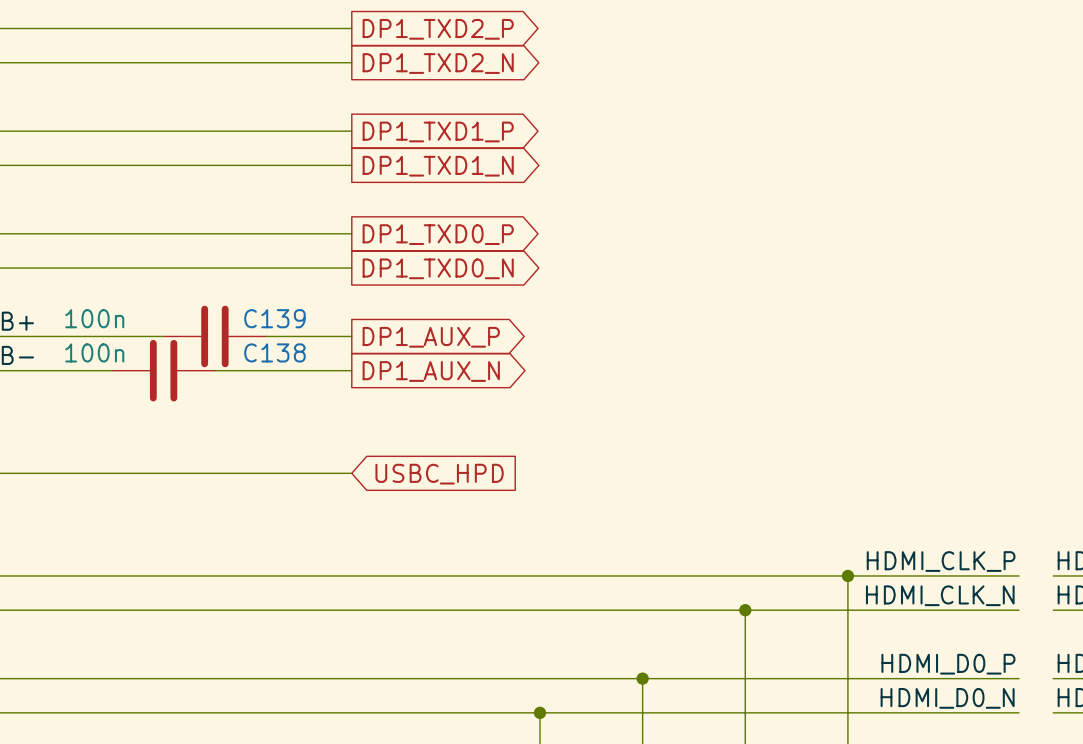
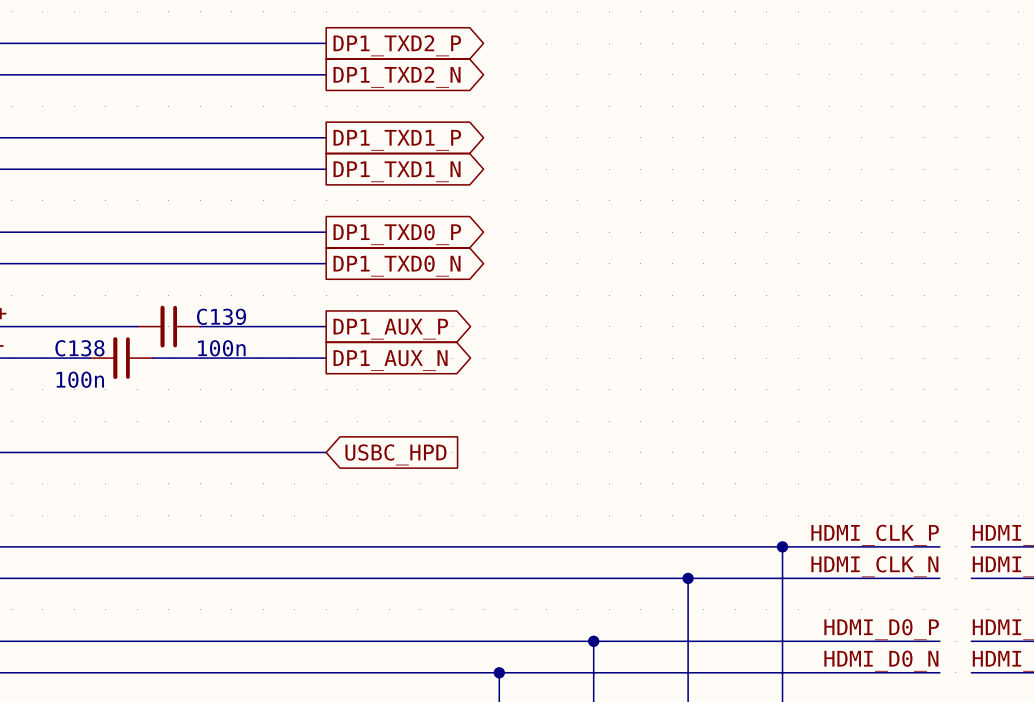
C139 symbol: [163, 305, 267, 368] -> [137, 305, 201, 348]
C139 text position: 100n (94, 318) -> 100n (221, 348)
C138 symbol: [112, 339, 215, 402] -> [90, 337, 154, 380]
C138 text position: 100n (94, 352) -> 100n (80, 379)
C138 name position: C138 (274, 352) -> C138 (79, 348)

